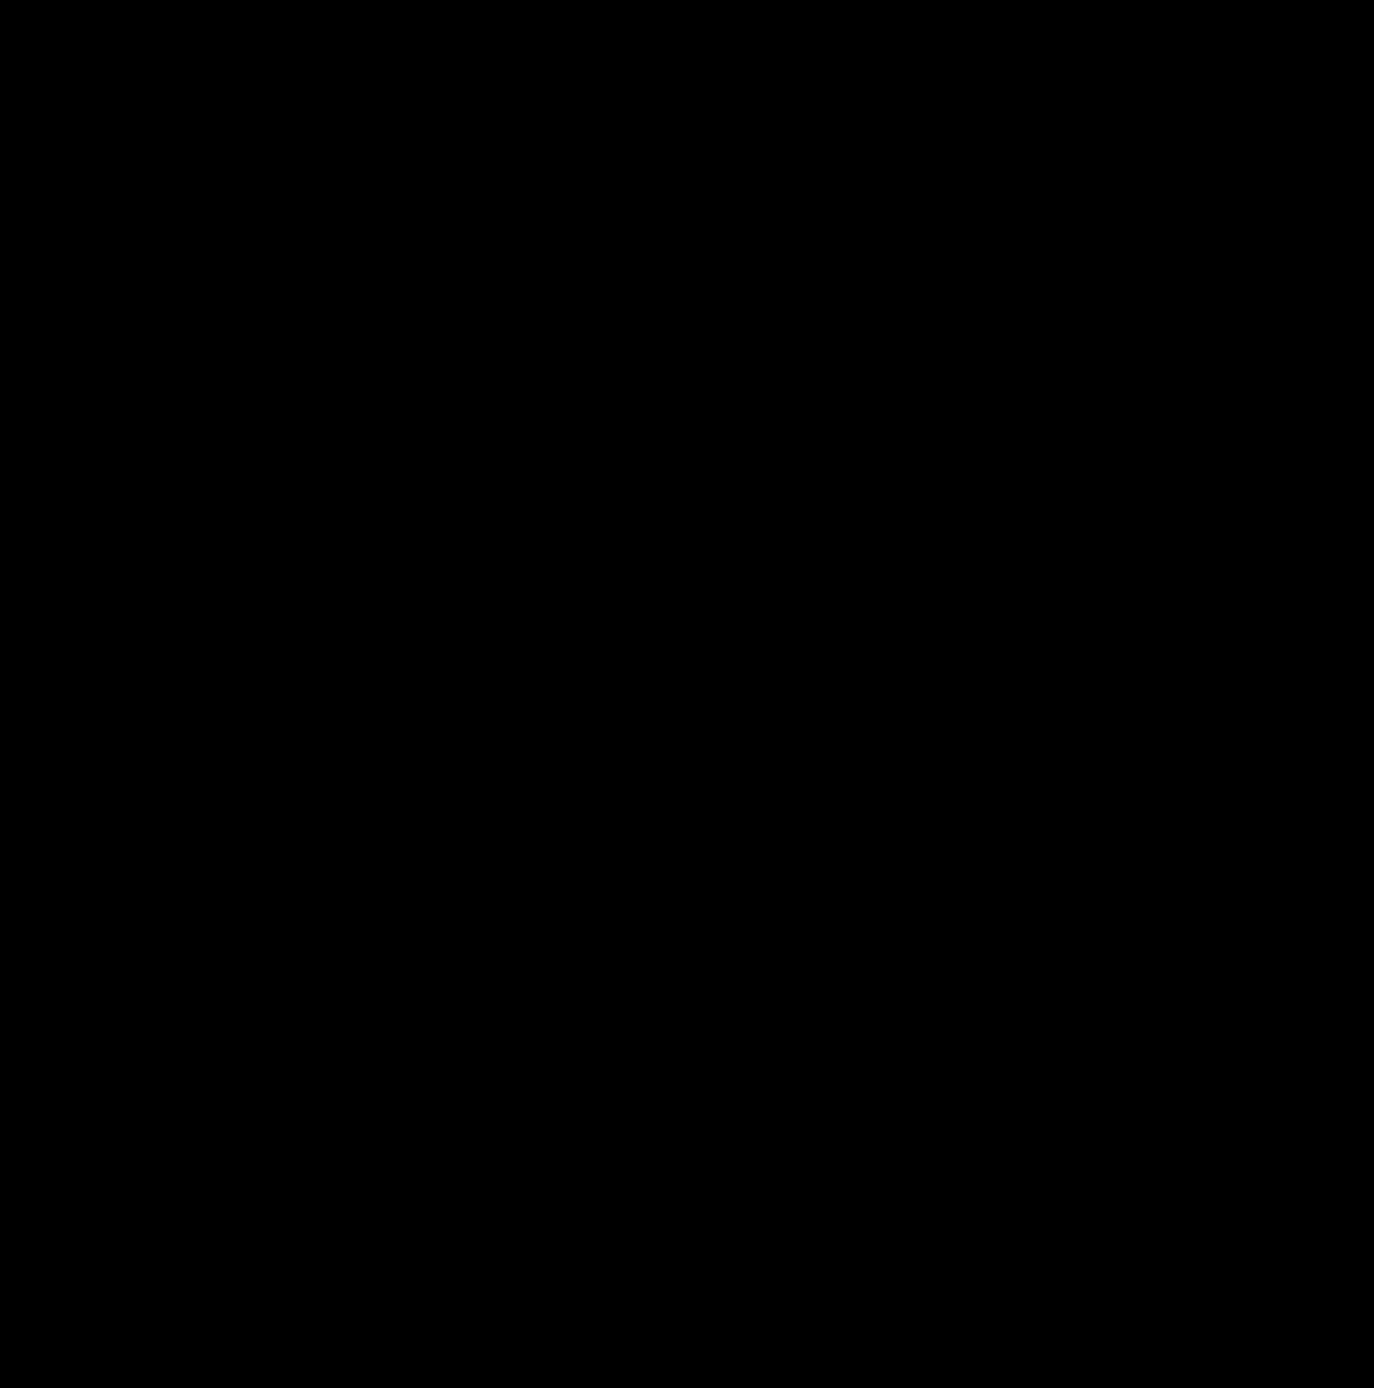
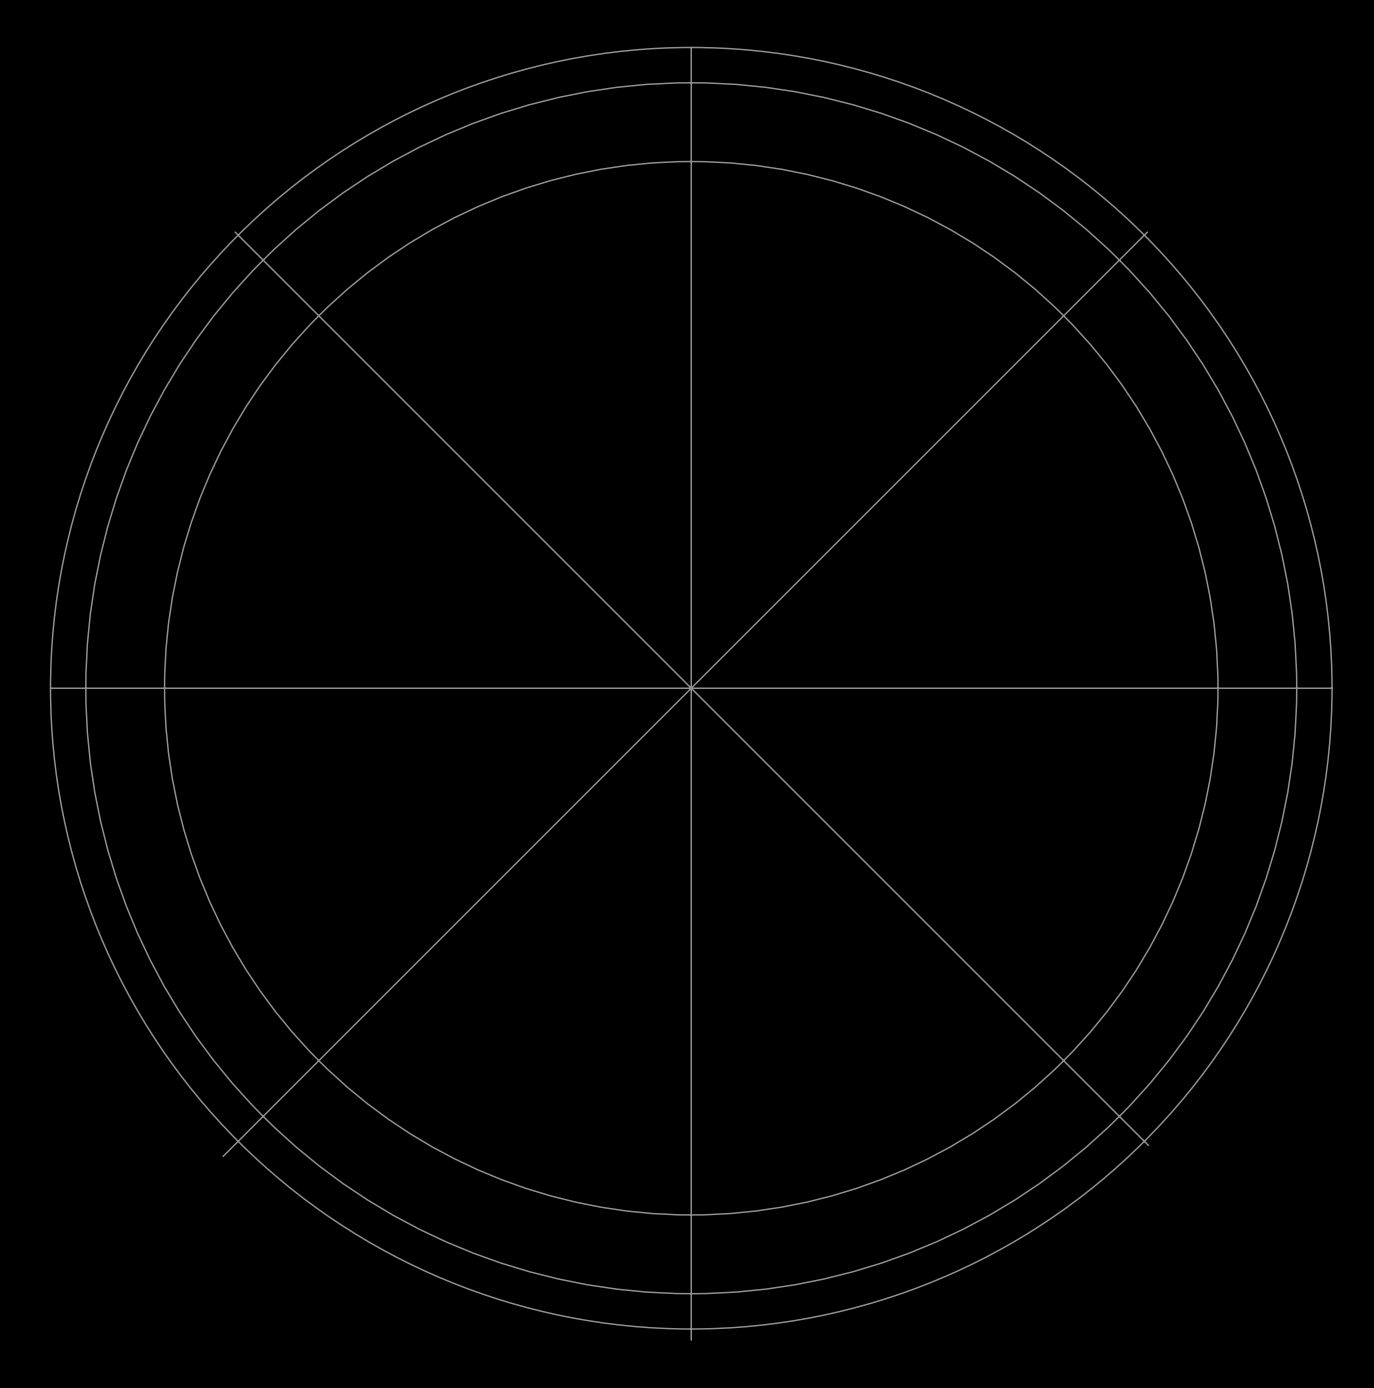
drawing: none -> [50, 46, 1333, 1330]
line: none -> (691, 47) (691, 1340)
line: none -> (235, 232) (1148, 1145)
line: none -> (1147, 232) (223, 1156)
line: none -> (50, 688) (1332, 688)

